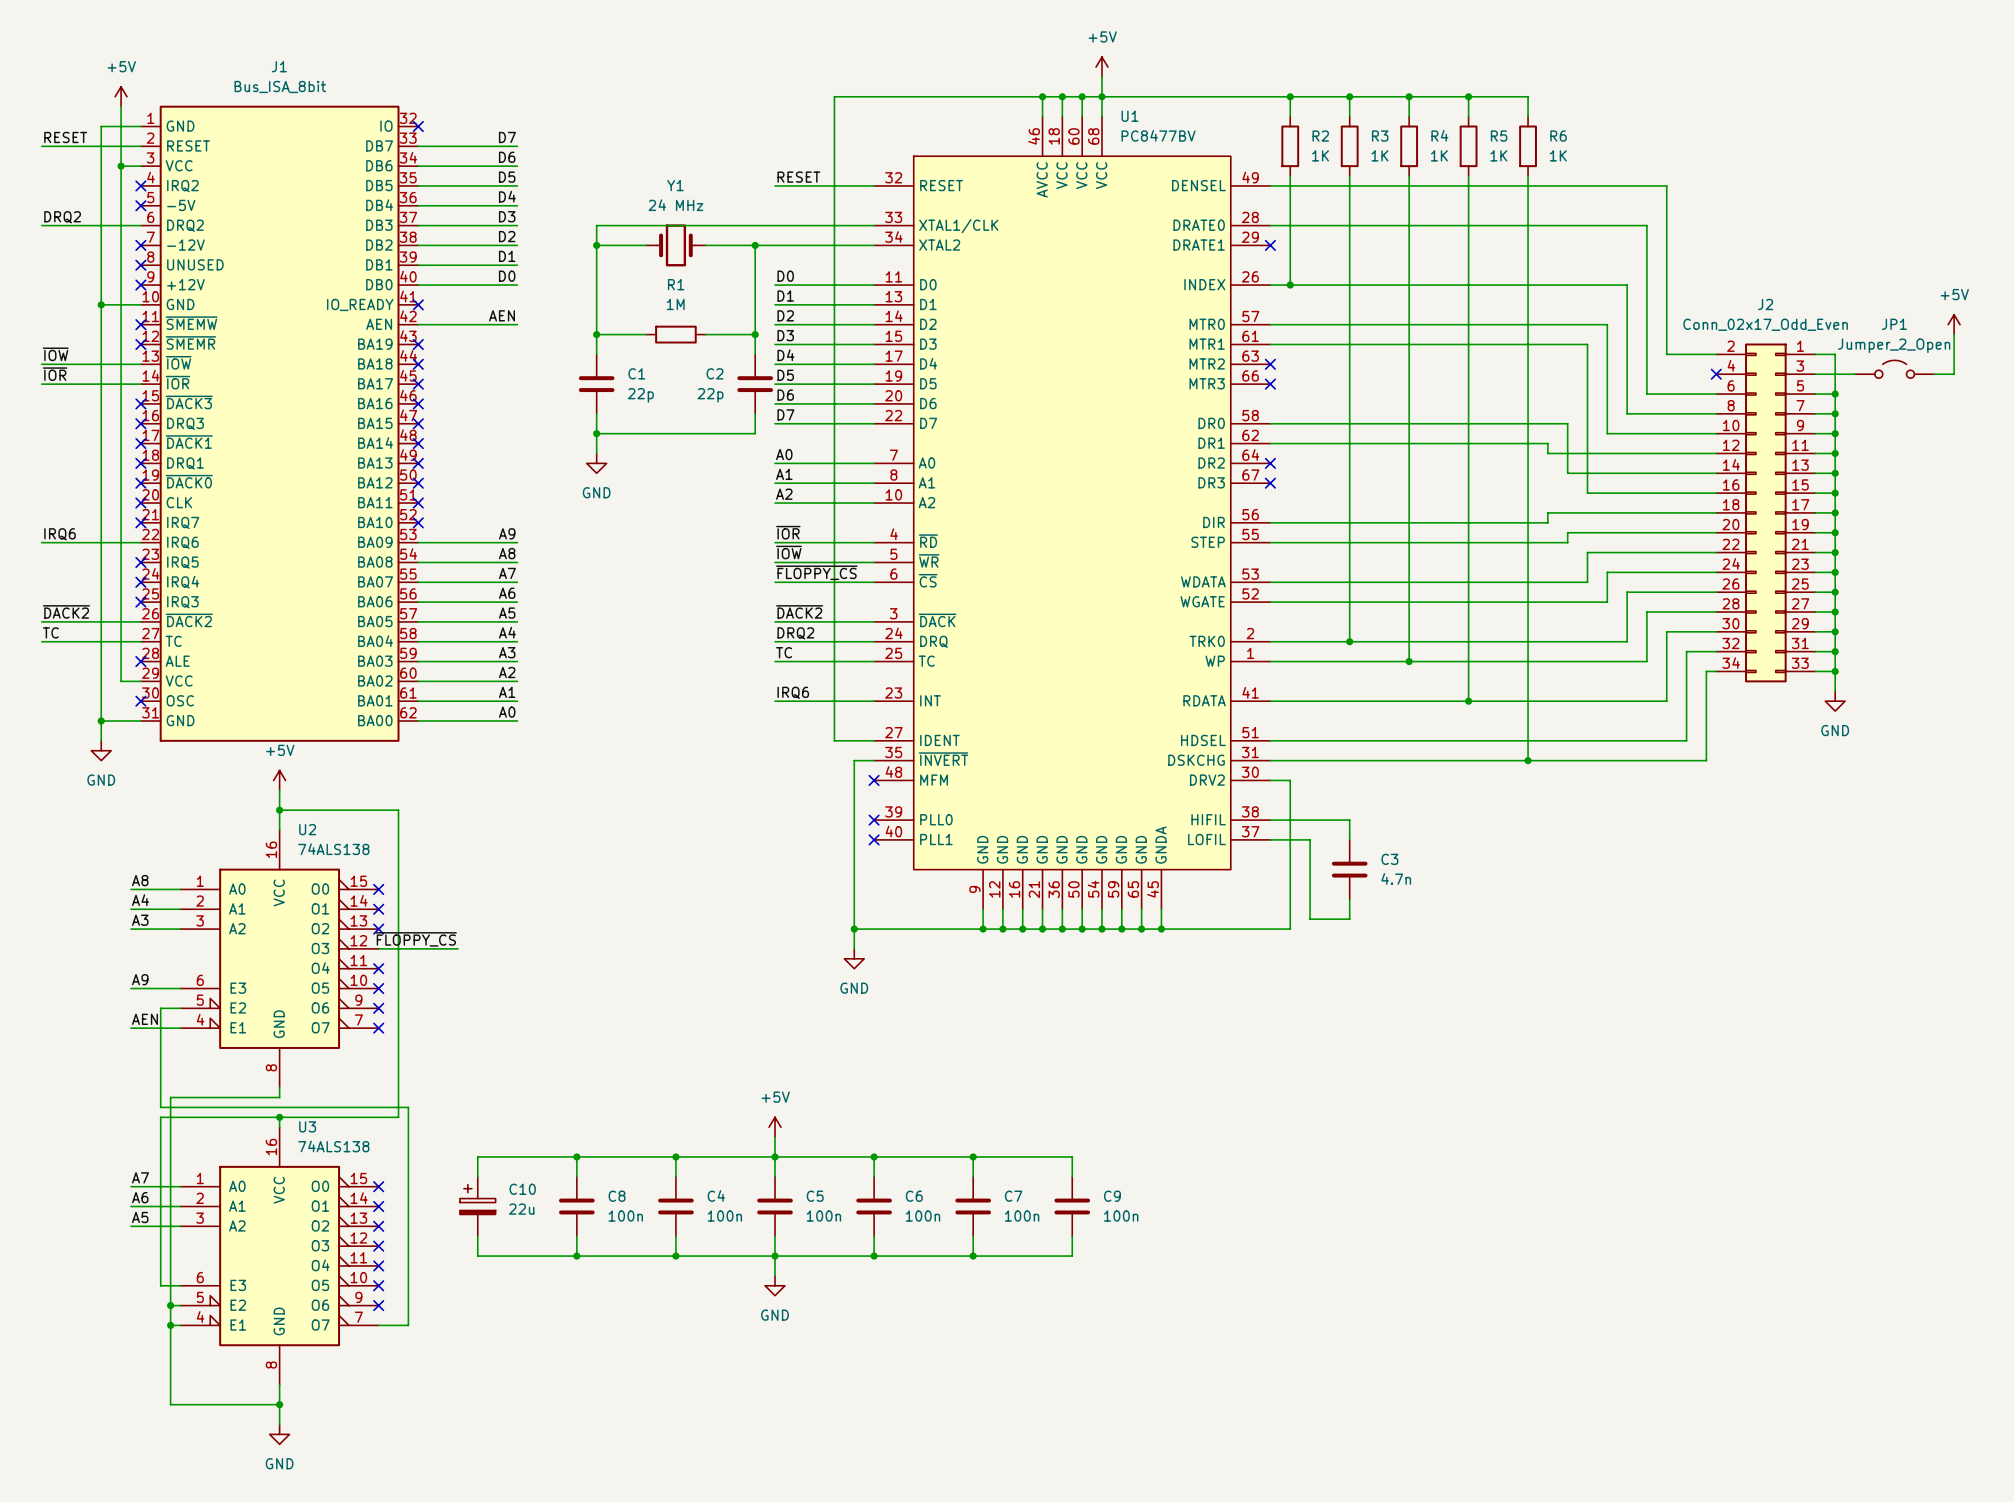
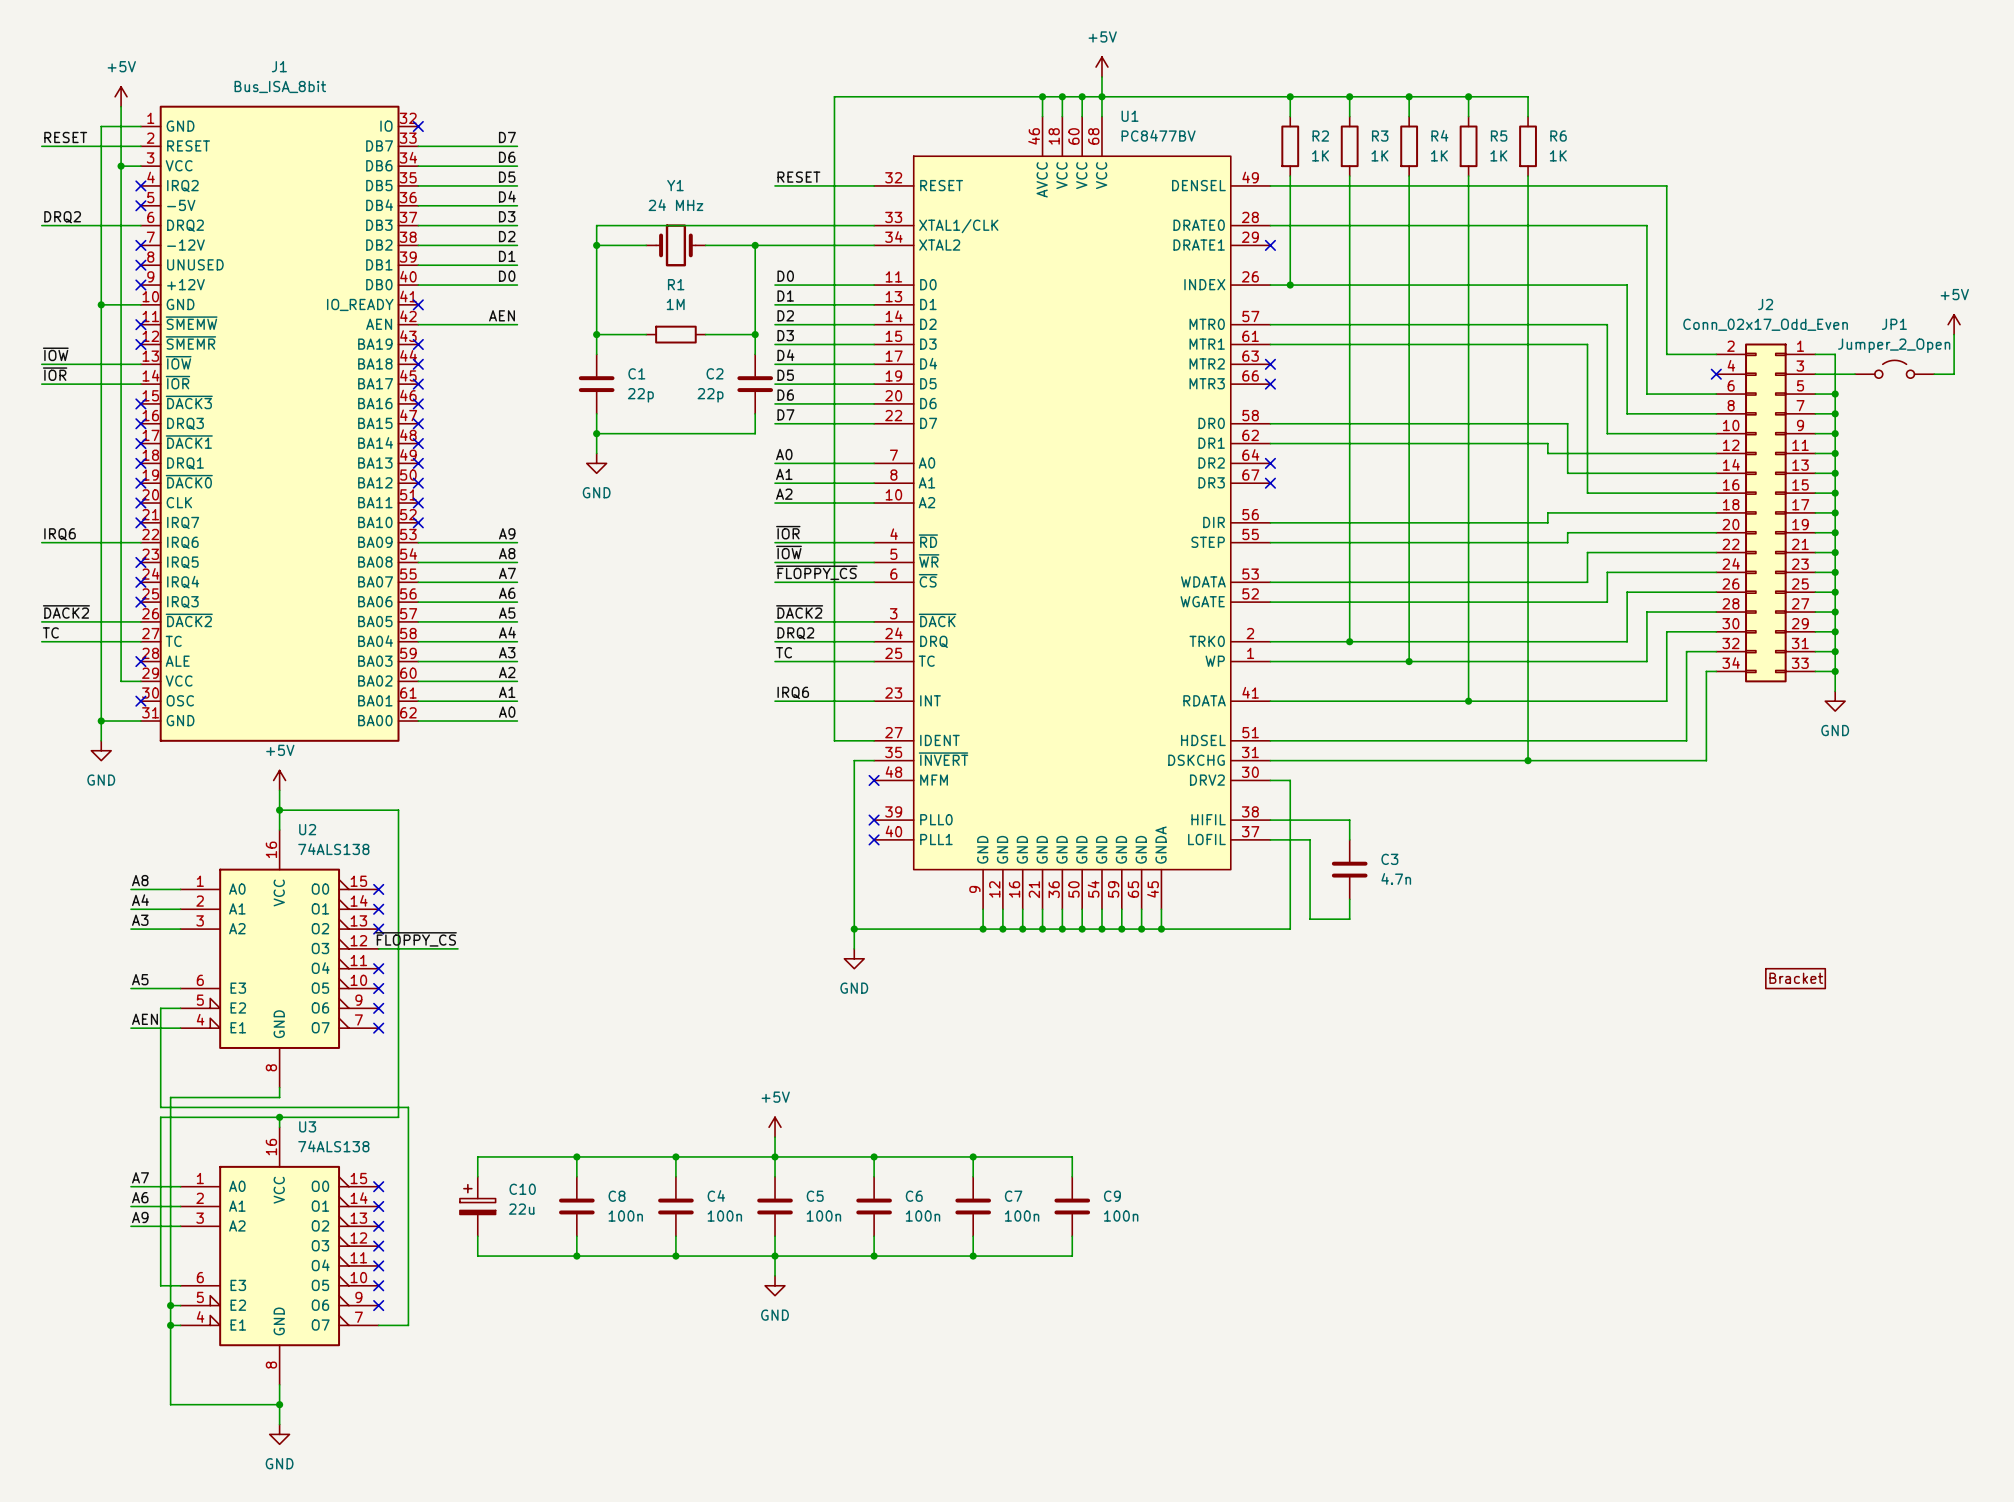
part: none -> (1795, 978)
label: A9 (140, 979) -> A5 (140, 979)
label: A5 (140, 1217) -> A9 (140, 1217)

